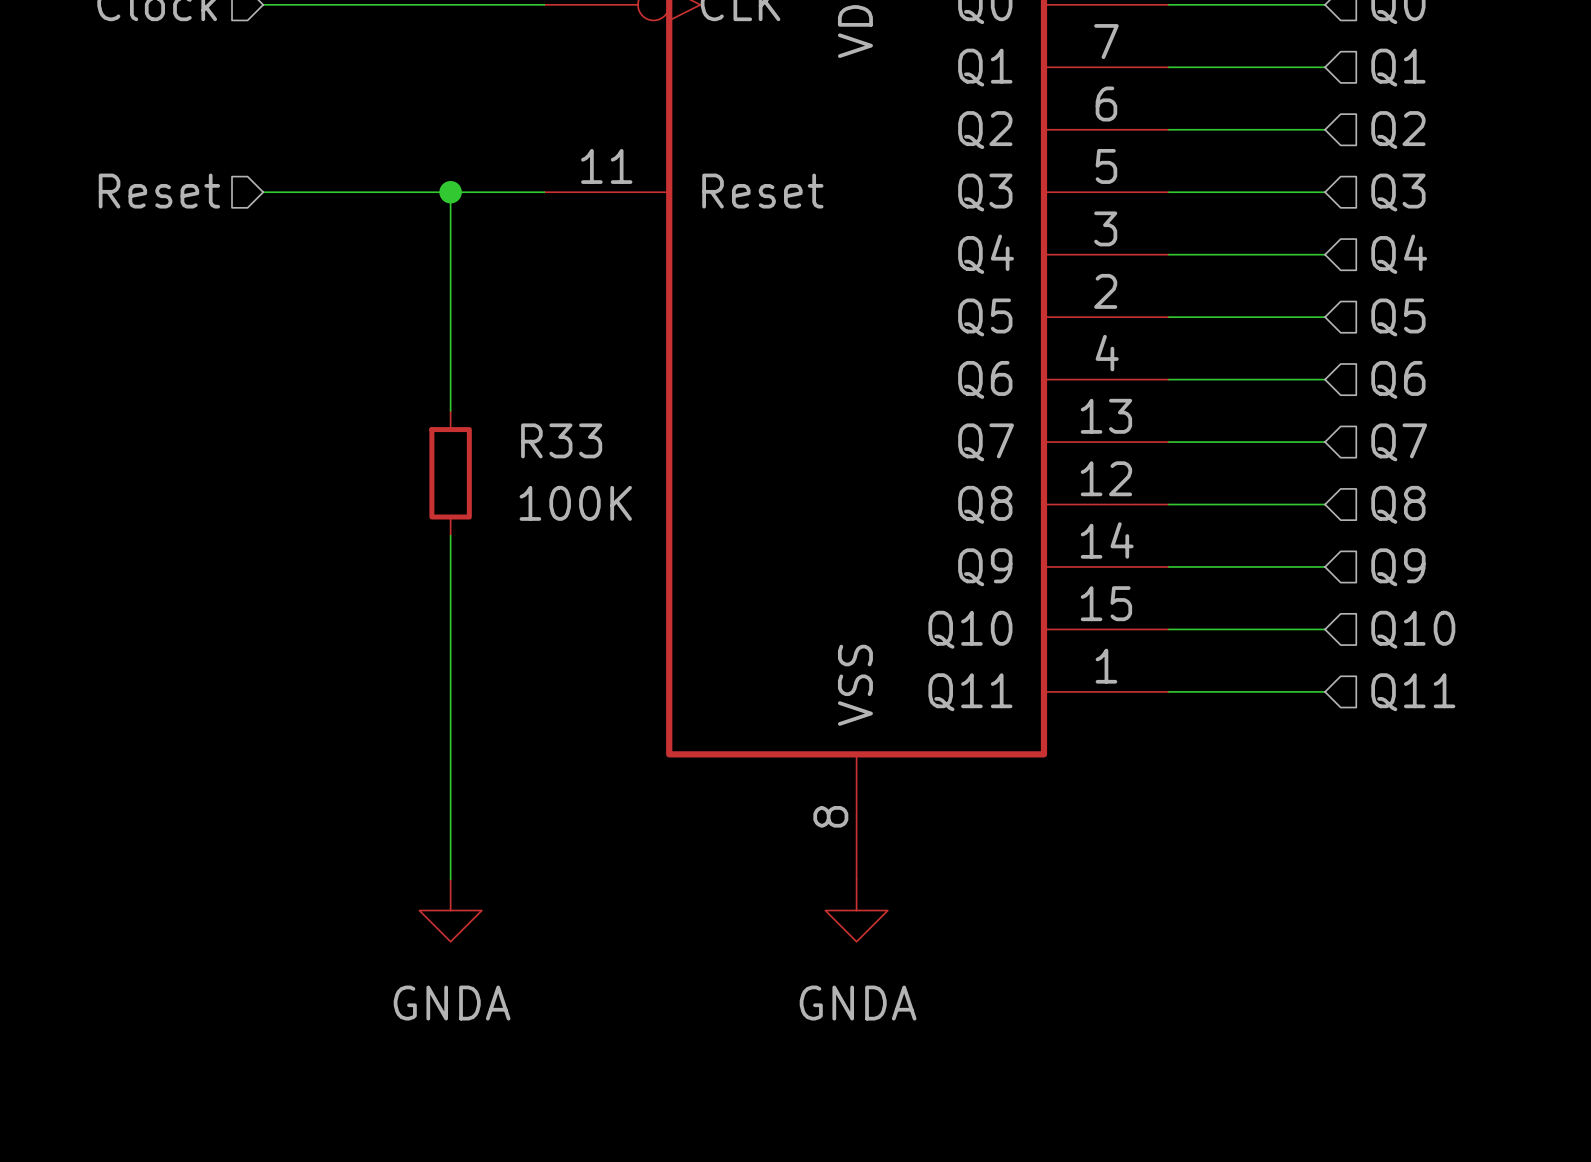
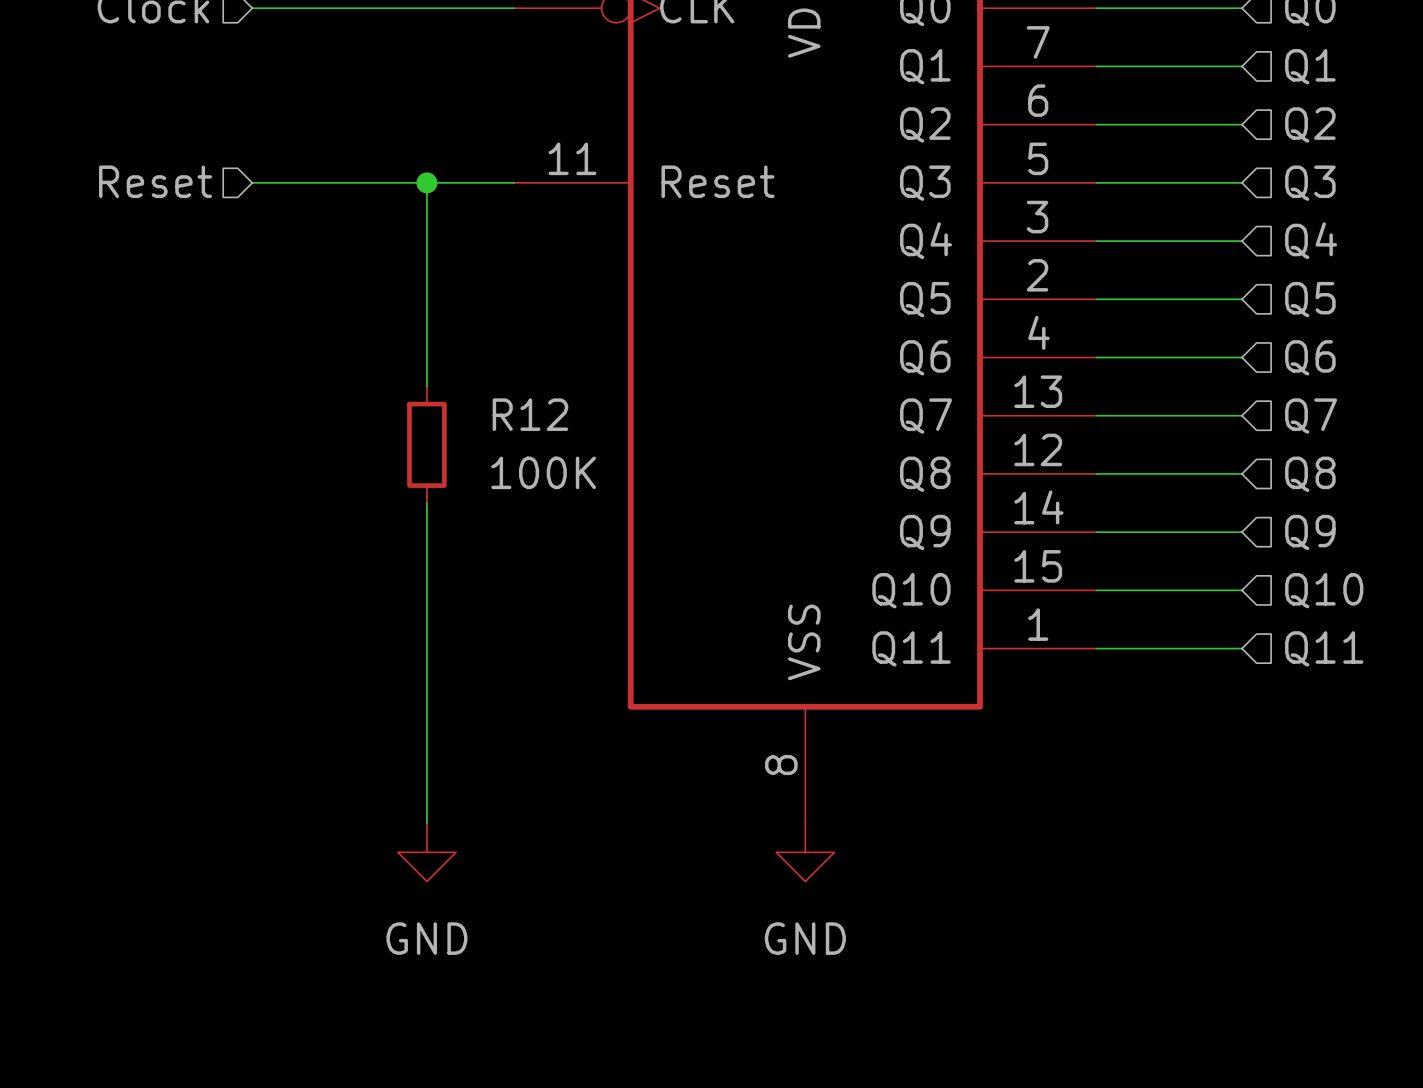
R33 name: R33 (561, 440) -> R12 (530, 414)
power symbol: GNDA (450, 910) -> GND (426, 852)
power symbol: GNDA (856, 910) -> GND (805, 852)

